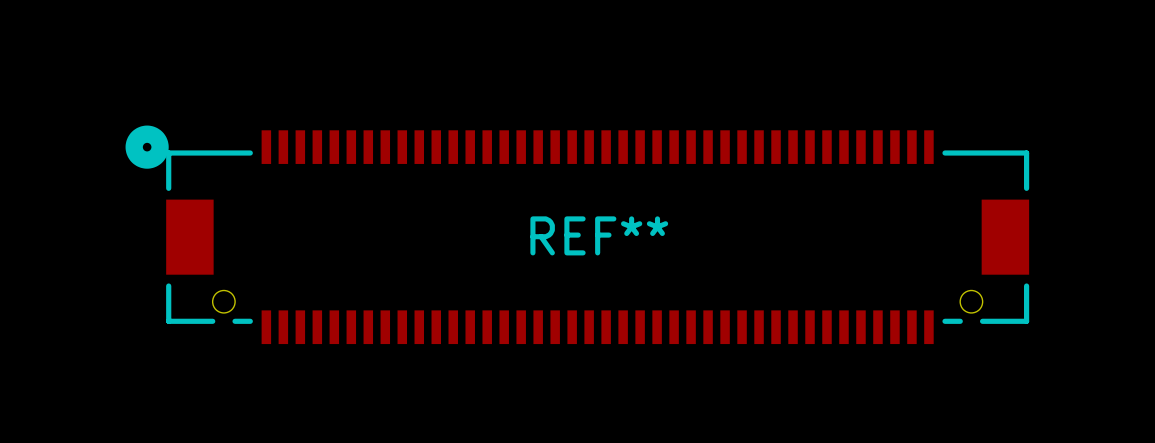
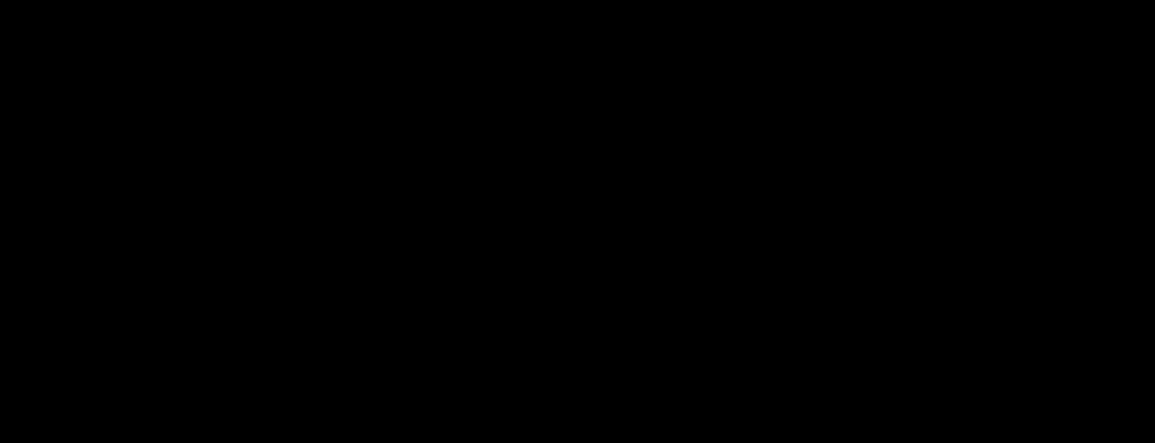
REF**: (577, 234) -> none

